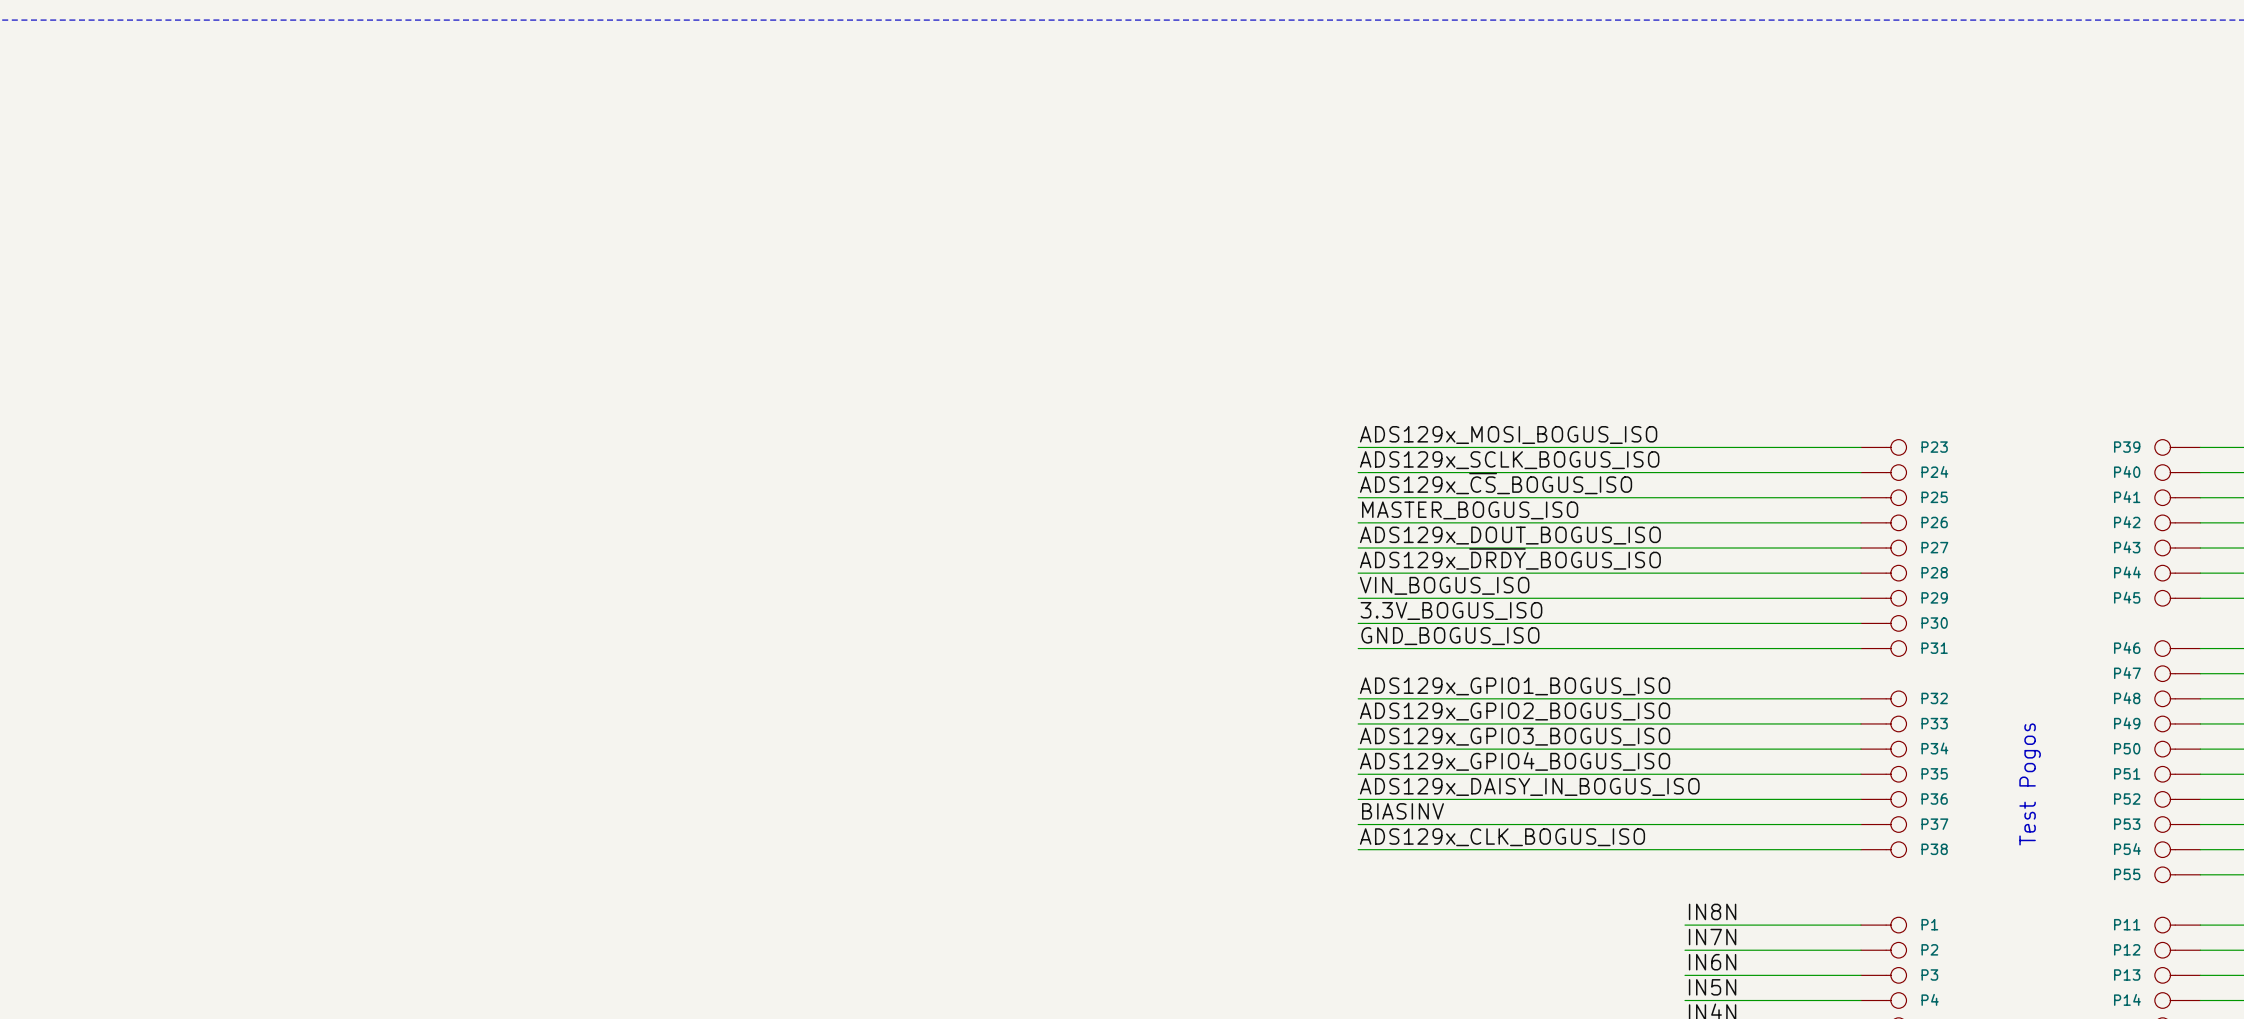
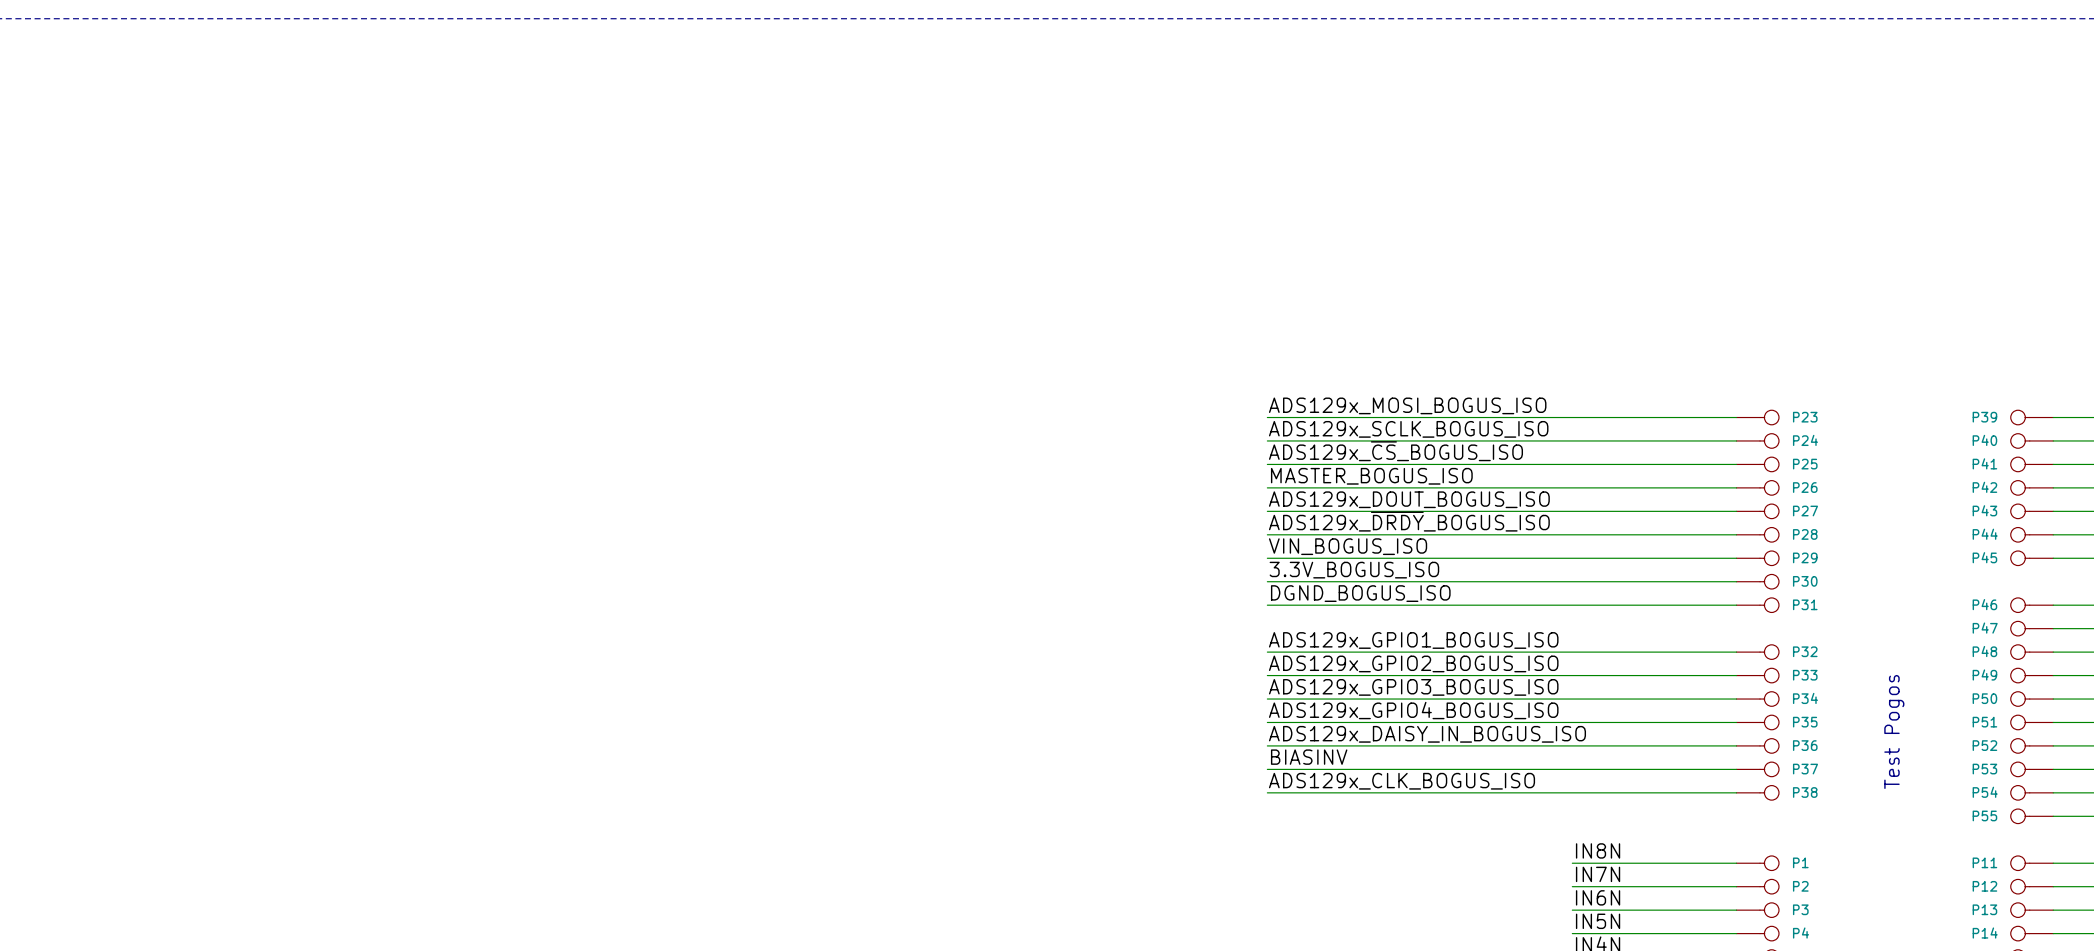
label: GND_BOGUS_ISO (1450, 636) -> DGND_BOGUS_ISO (1360, 593)

